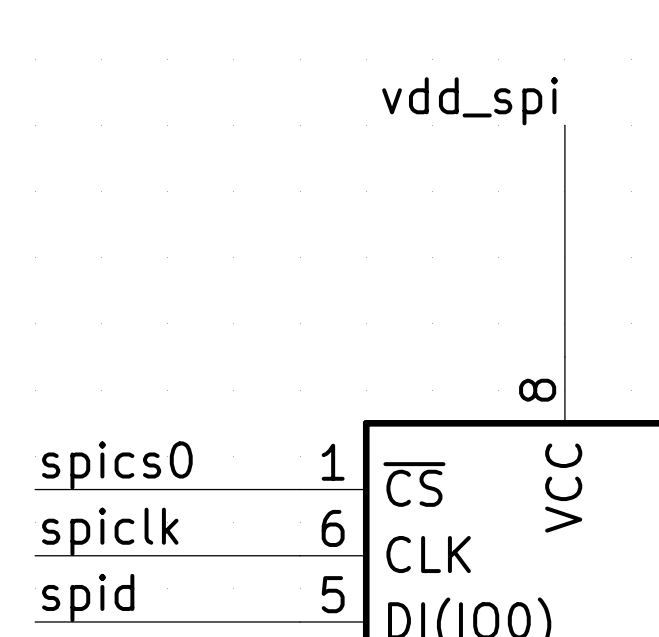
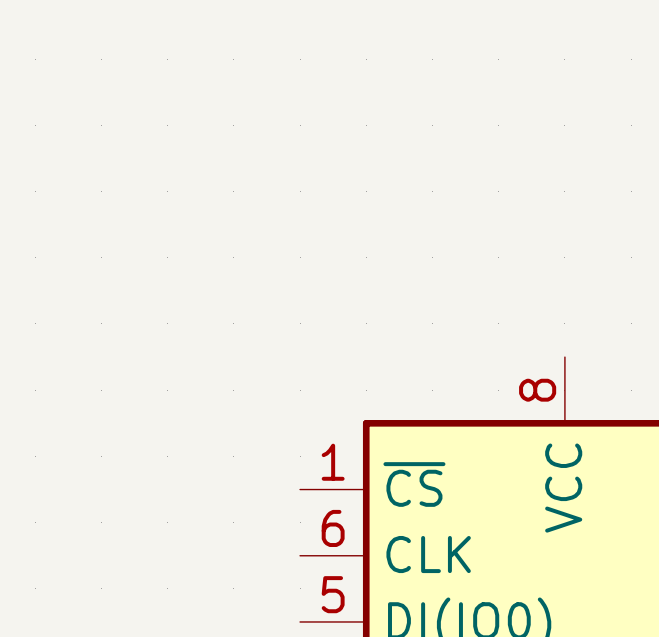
label: vdd_spi (470, 101) -> none
wire: (564, 125) (564, 357) -> none
label: spics0 (117, 465) -> none
wire: (35, 489) (300, 489) -> none
label: spiclk (110, 531) -> none
wire: (35, 555) (300, 555) -> none
label: spid (88, 597) -> none
wire: (35, 621) (300, 621) -> none

